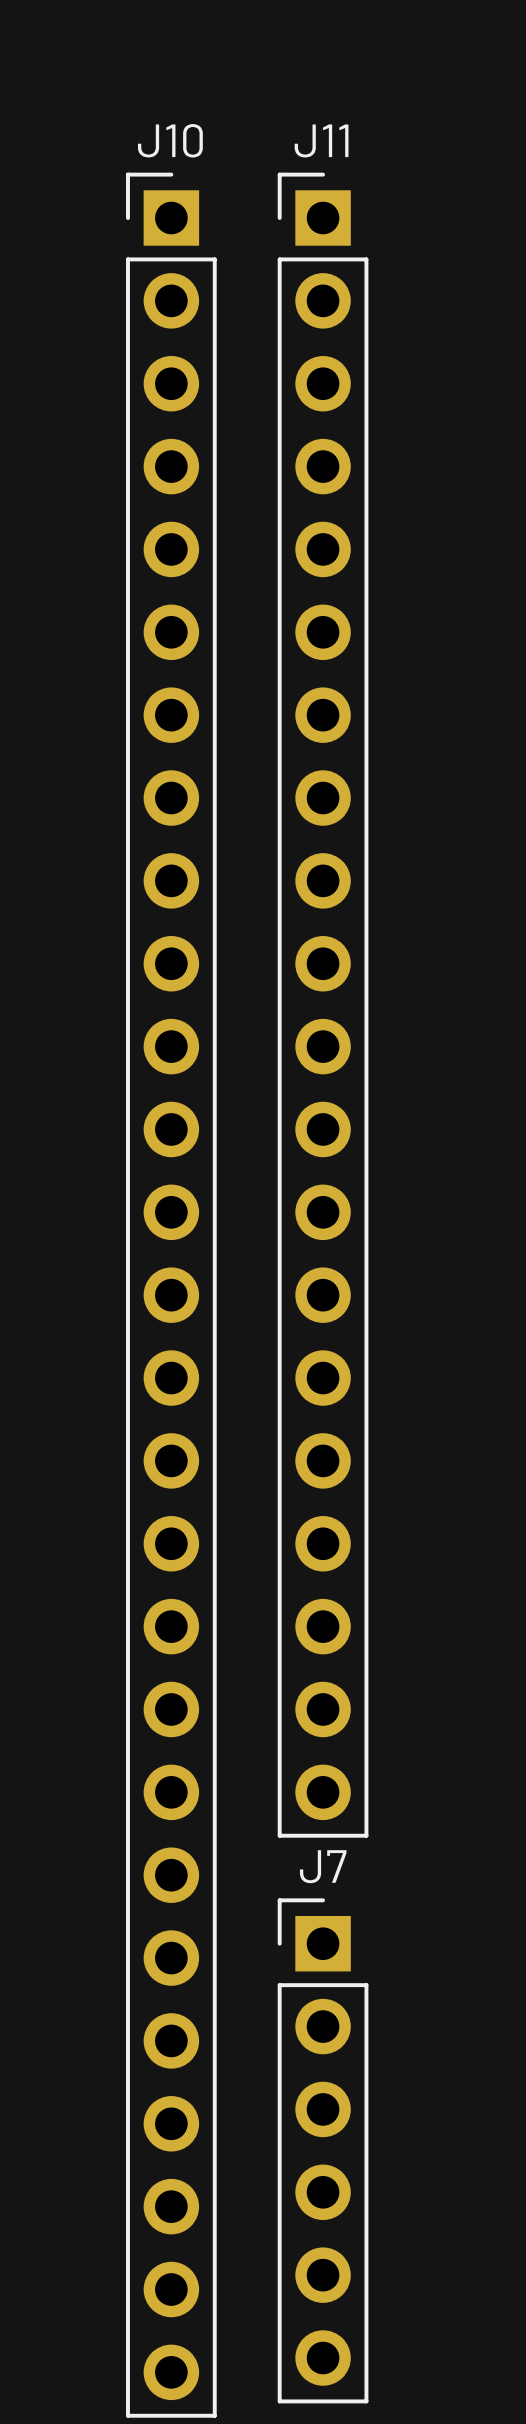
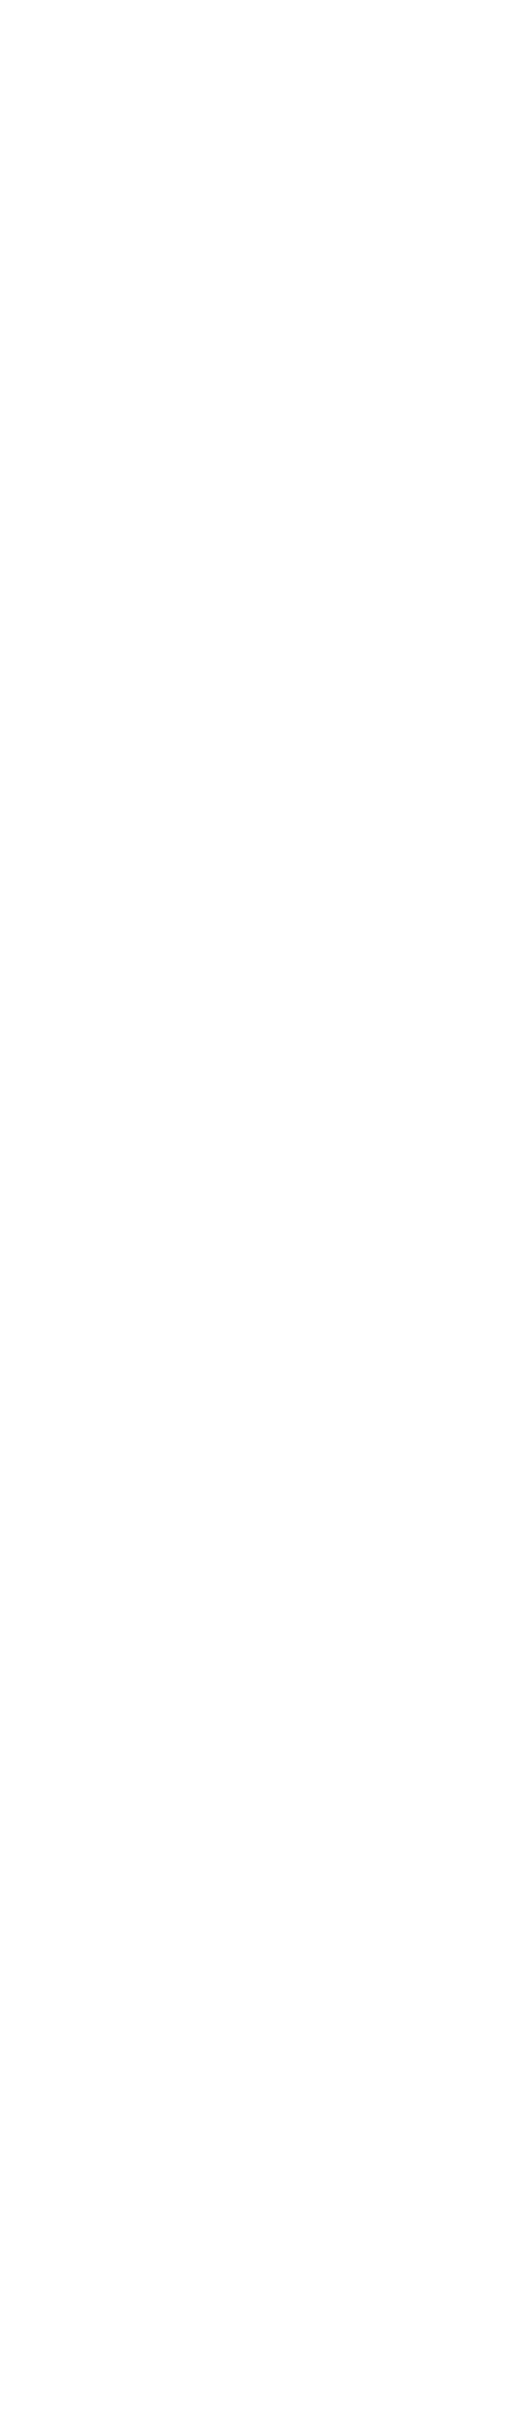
J11: (323, 1005) -> none
J10: (171, 1295) -> none
J7: (323, 2150) -> none

